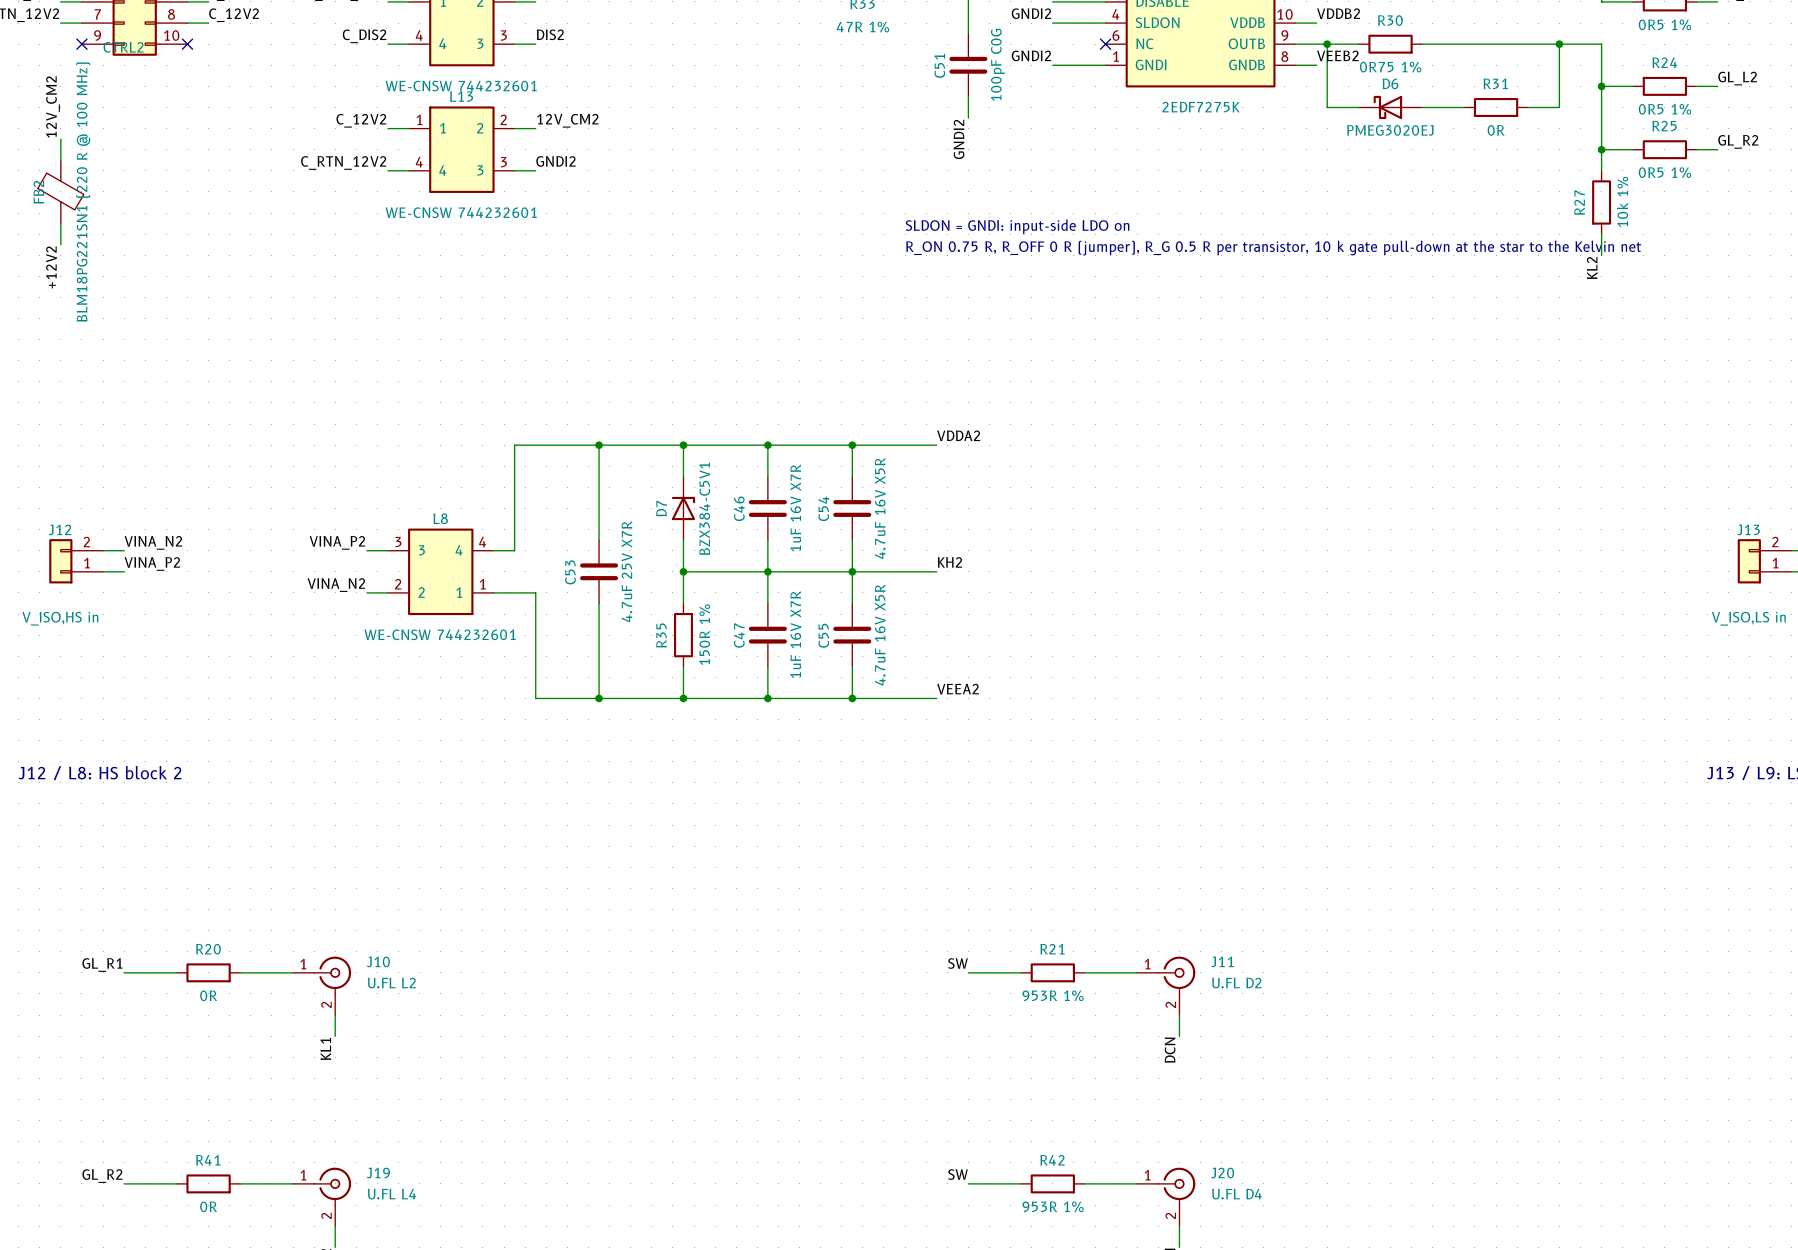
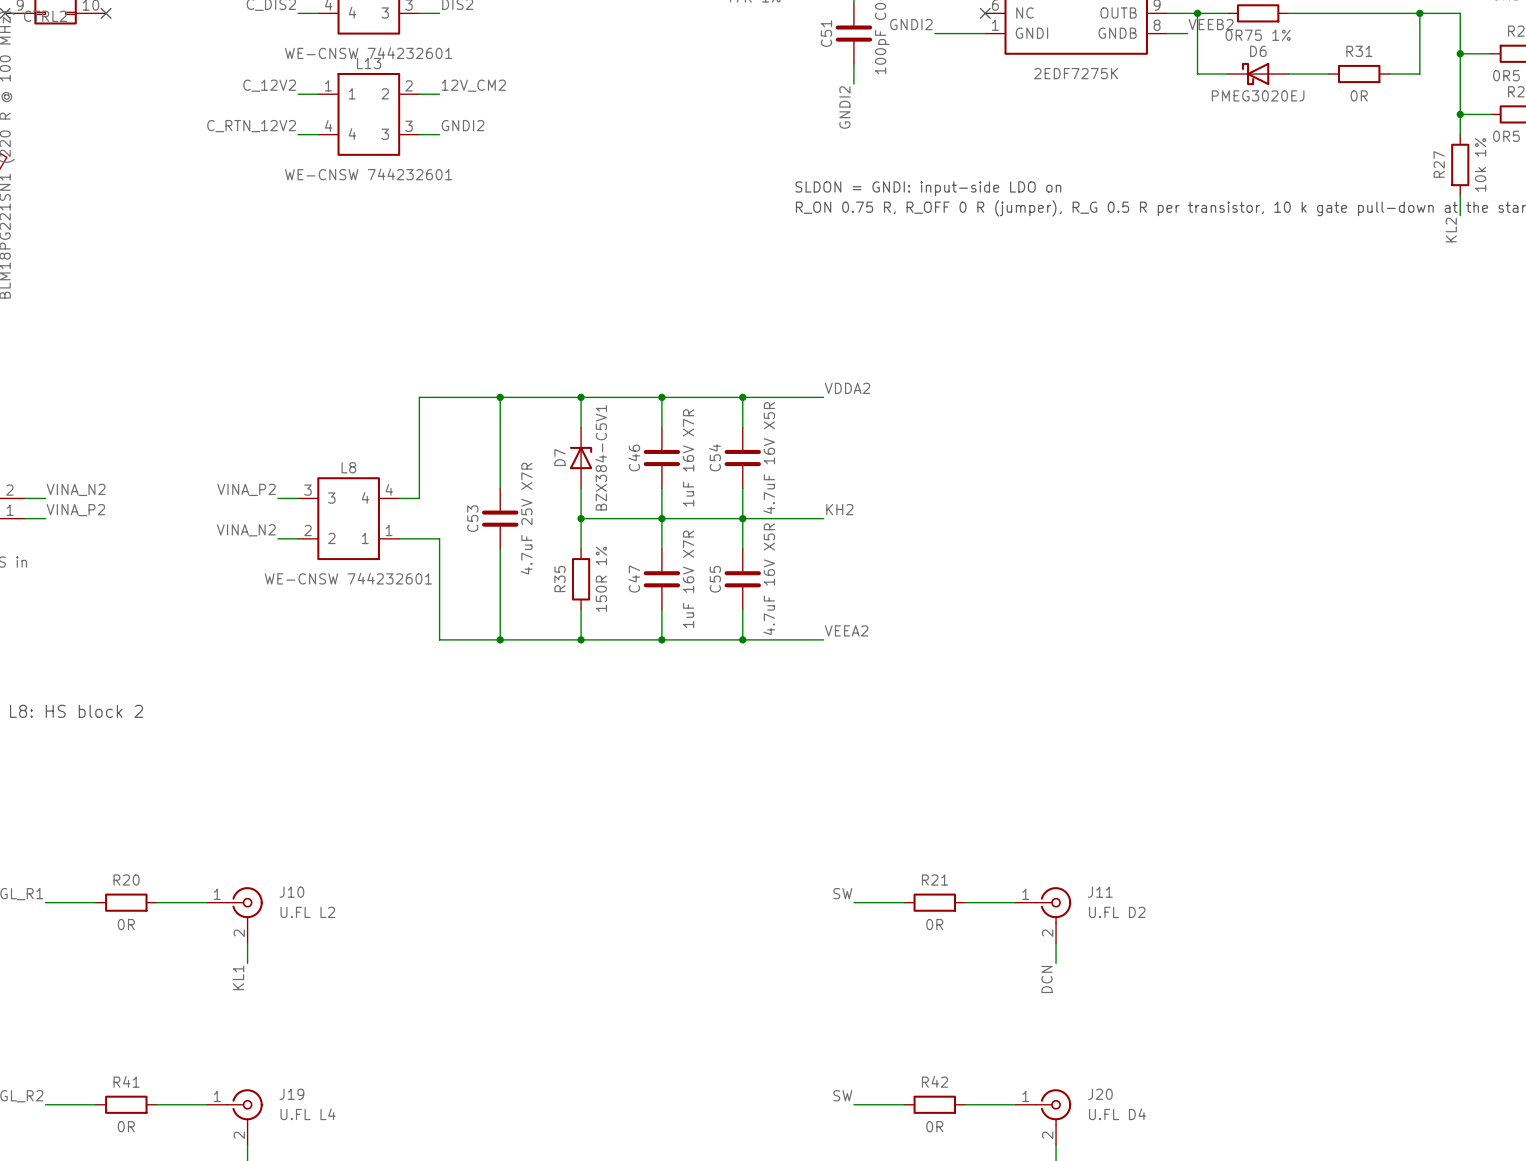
R21 value: 953R 1% (1053, 995) -> 0R (934, 924)
R42 value: 953R 1% (1053, 1206) -> 0R (934, 1126)

